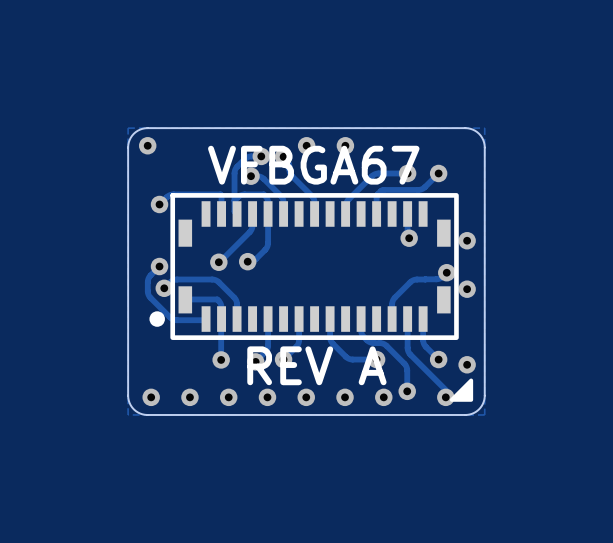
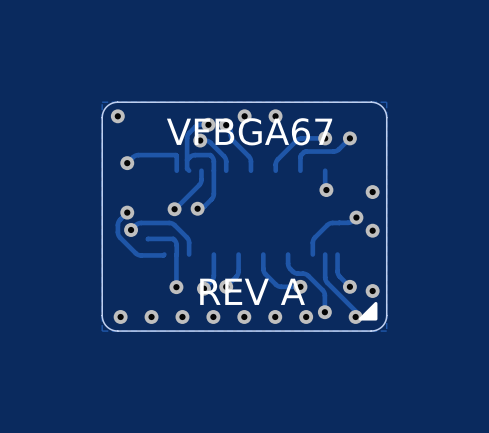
part: (304, 266) -> none

